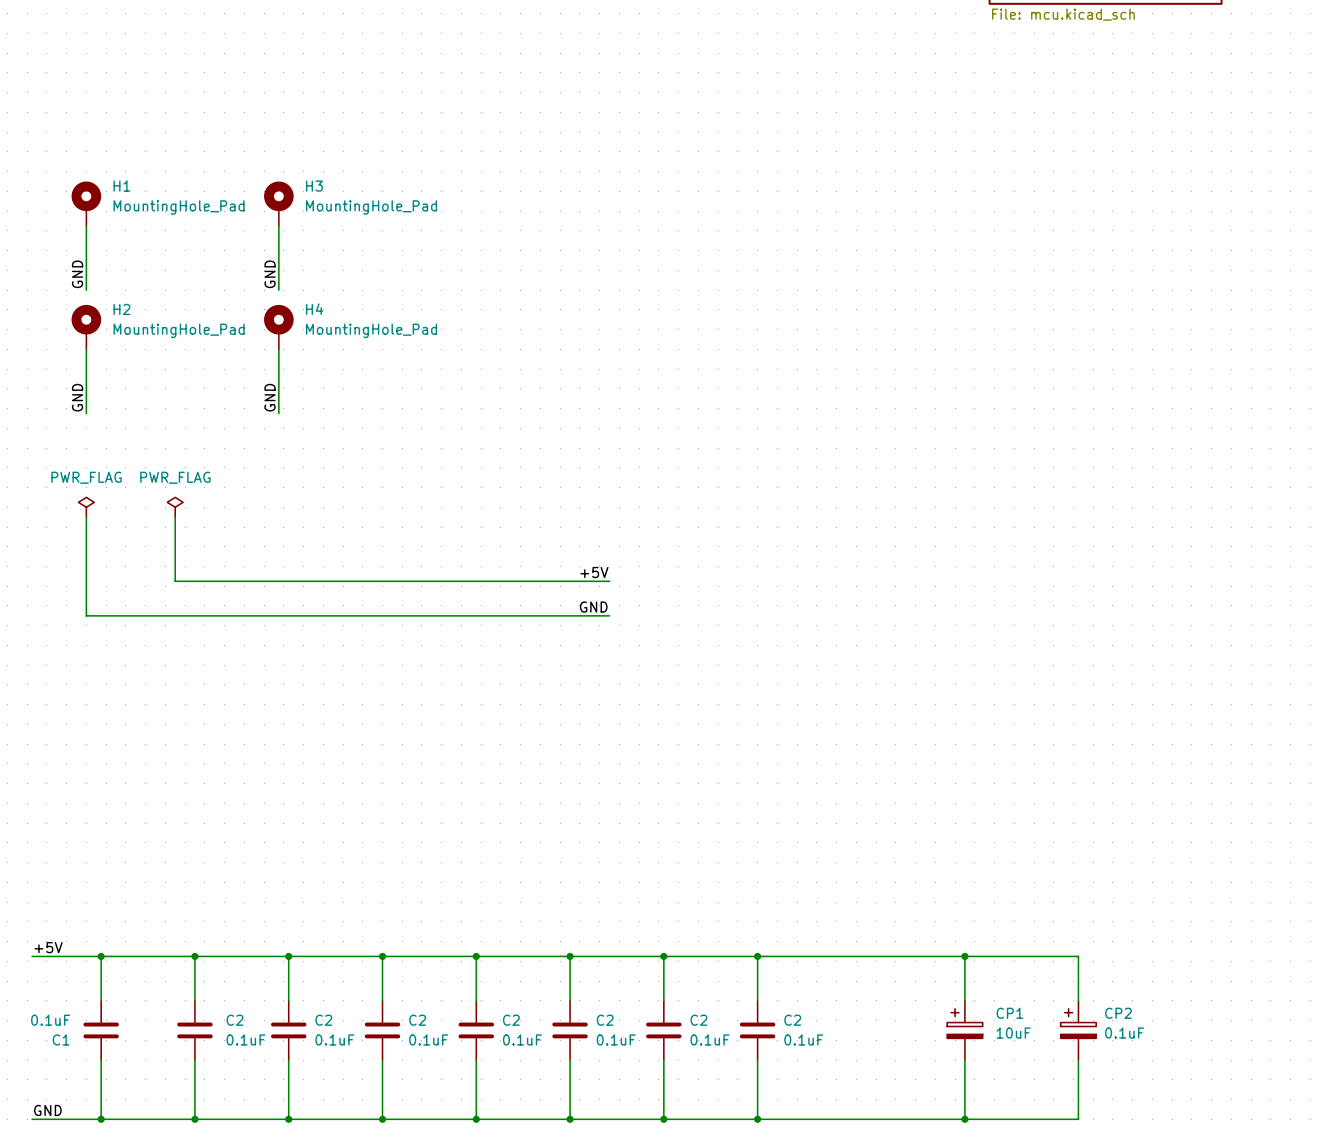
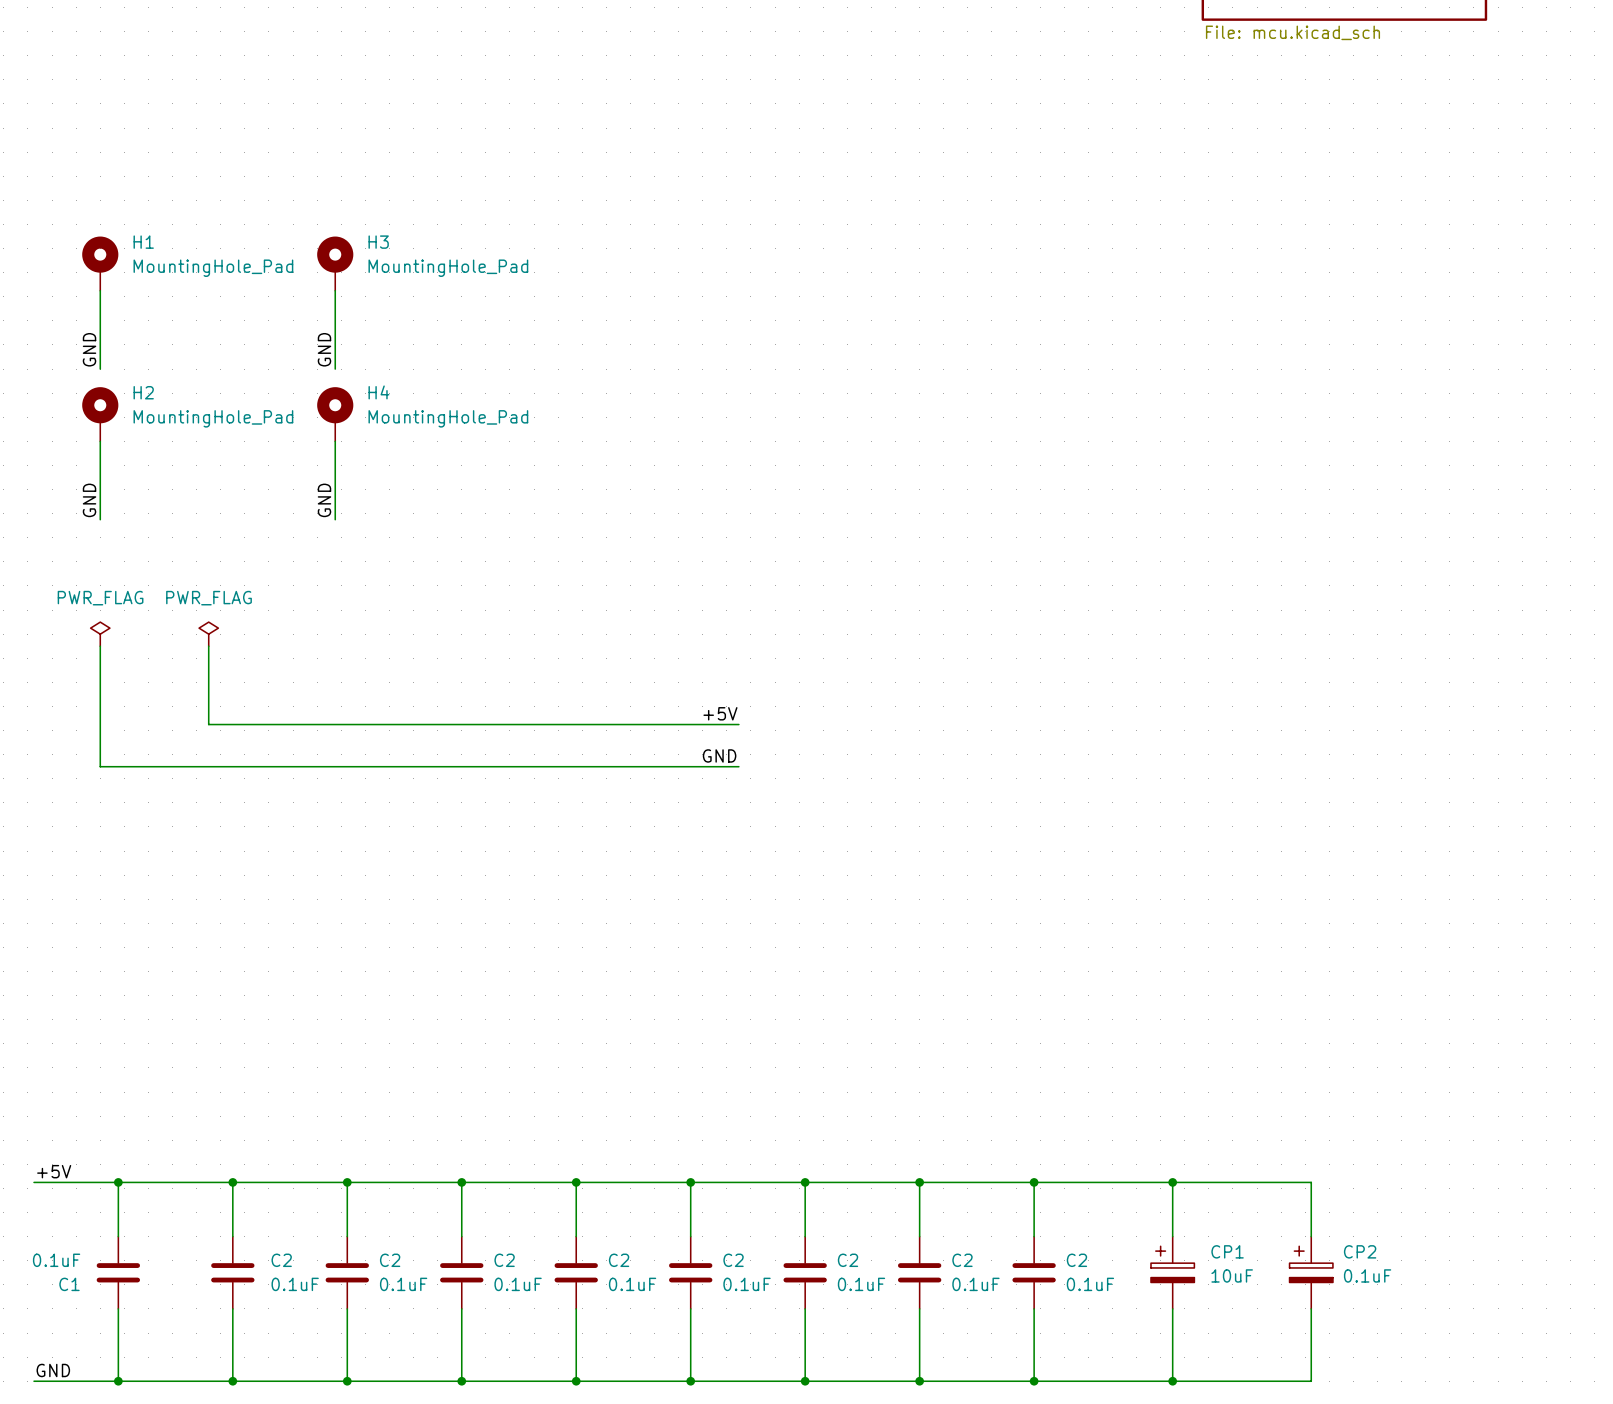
wire: none -> (1034, 1182) (1034, 1236)
junction: none -> (1034, 1182)
C2: none -> 0.1uF (1034, 1272)
wire: none -> (1034, 1308) (1034, 1381)
junction: none -> (1034, 1381)

